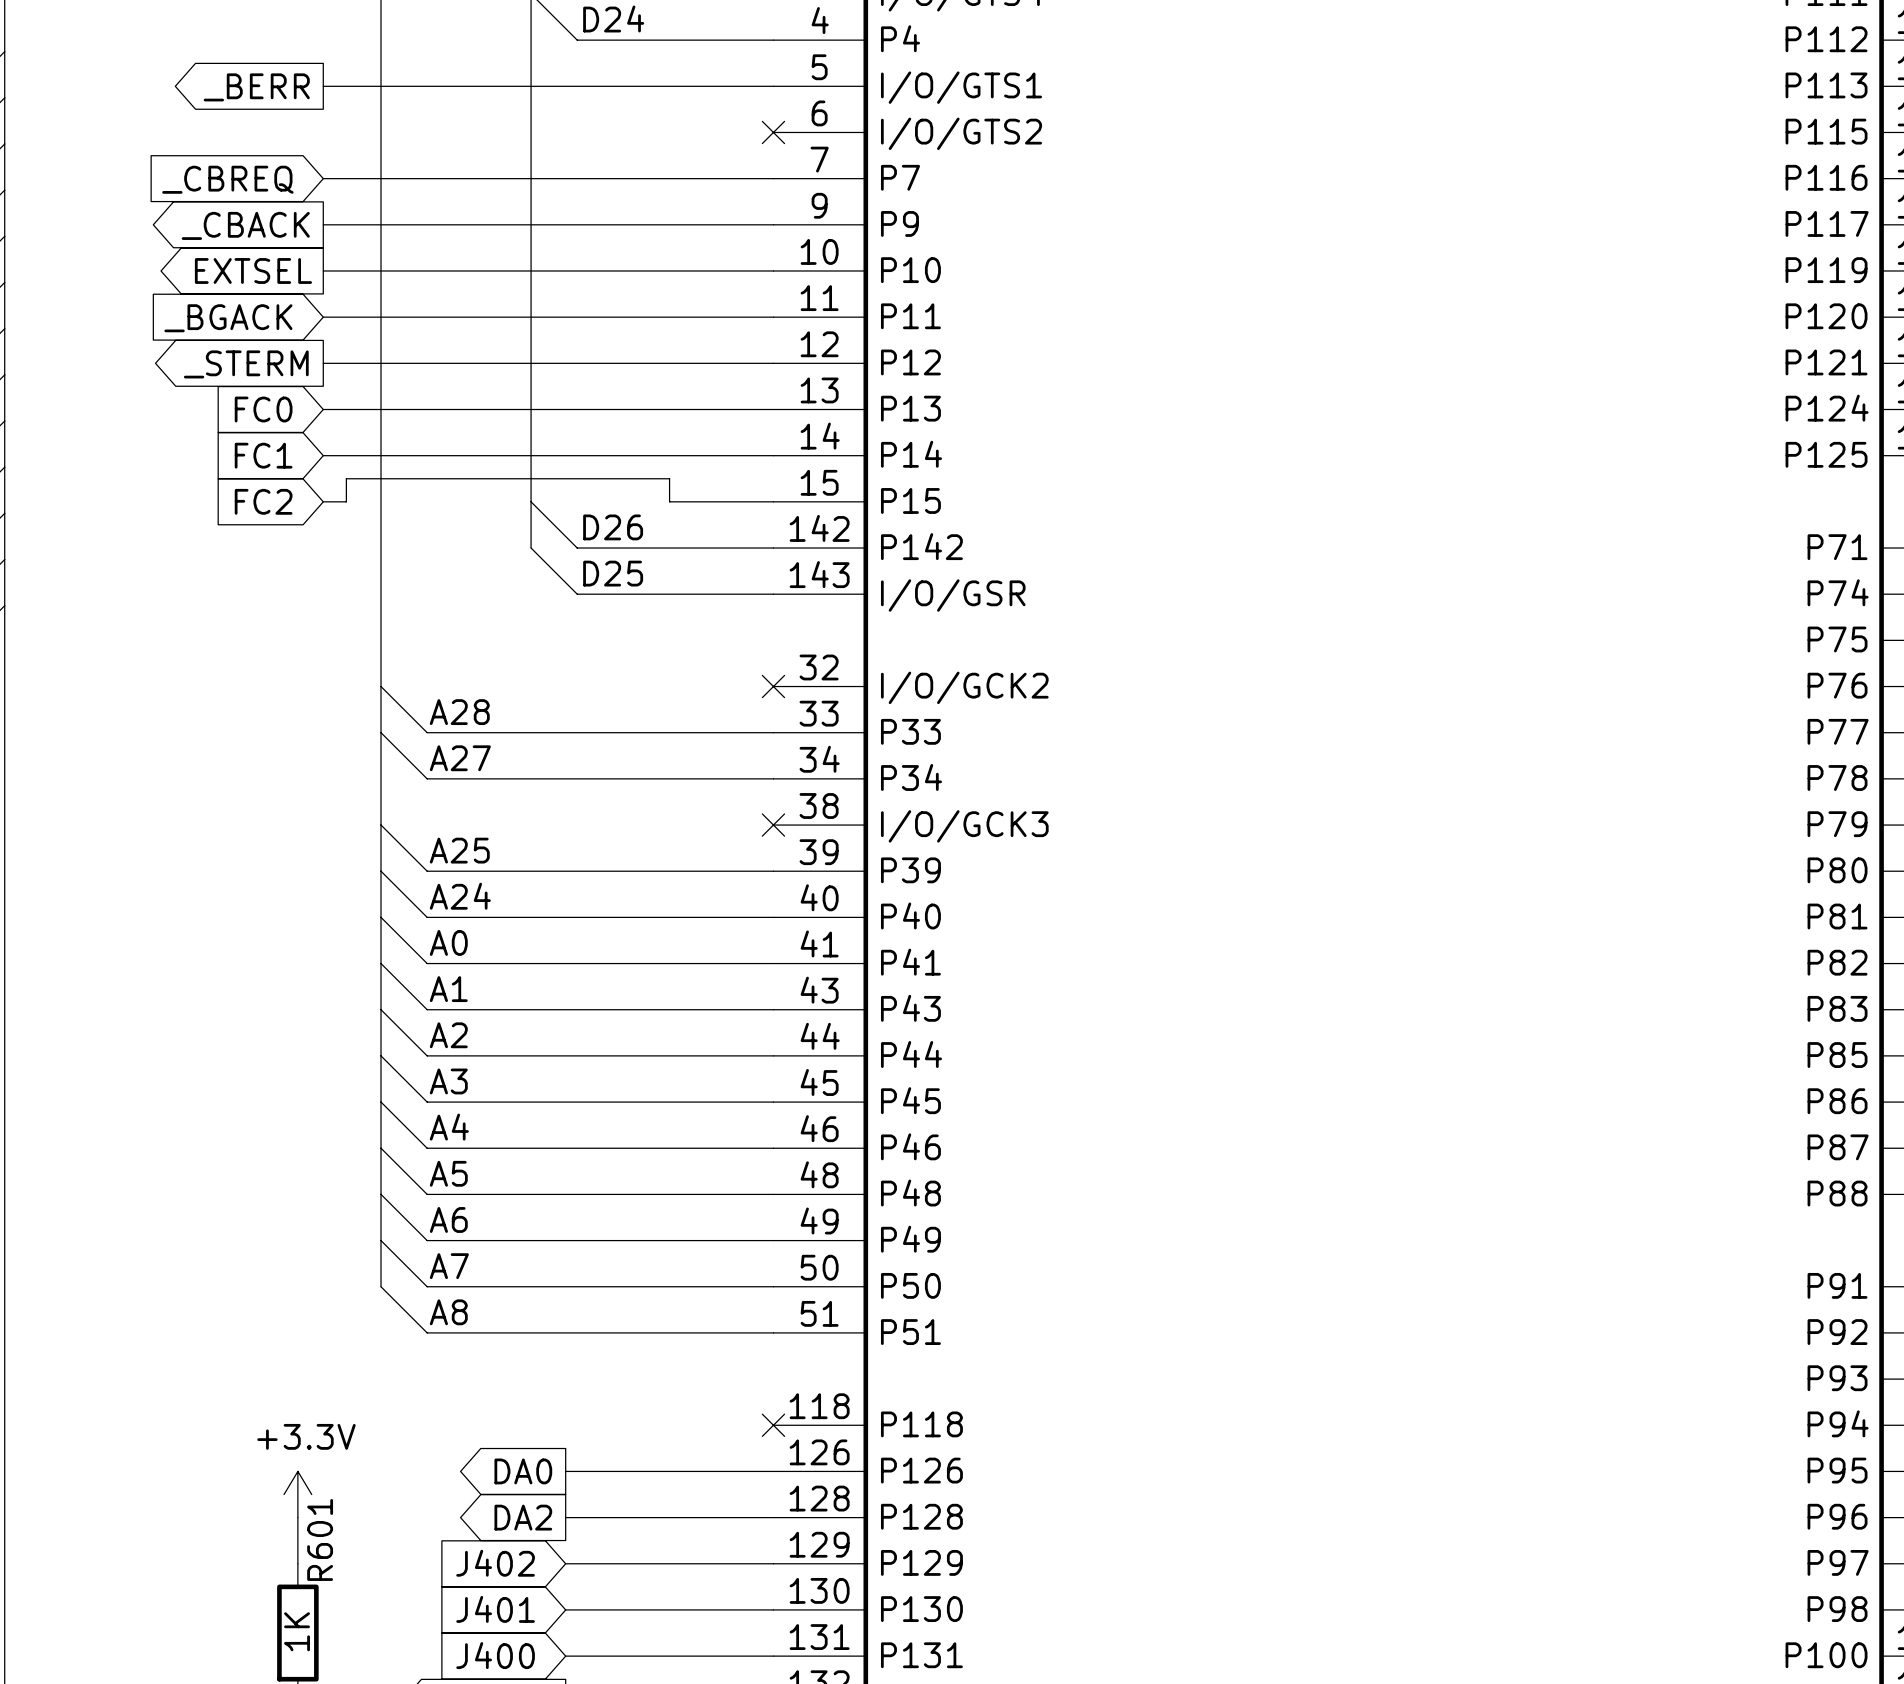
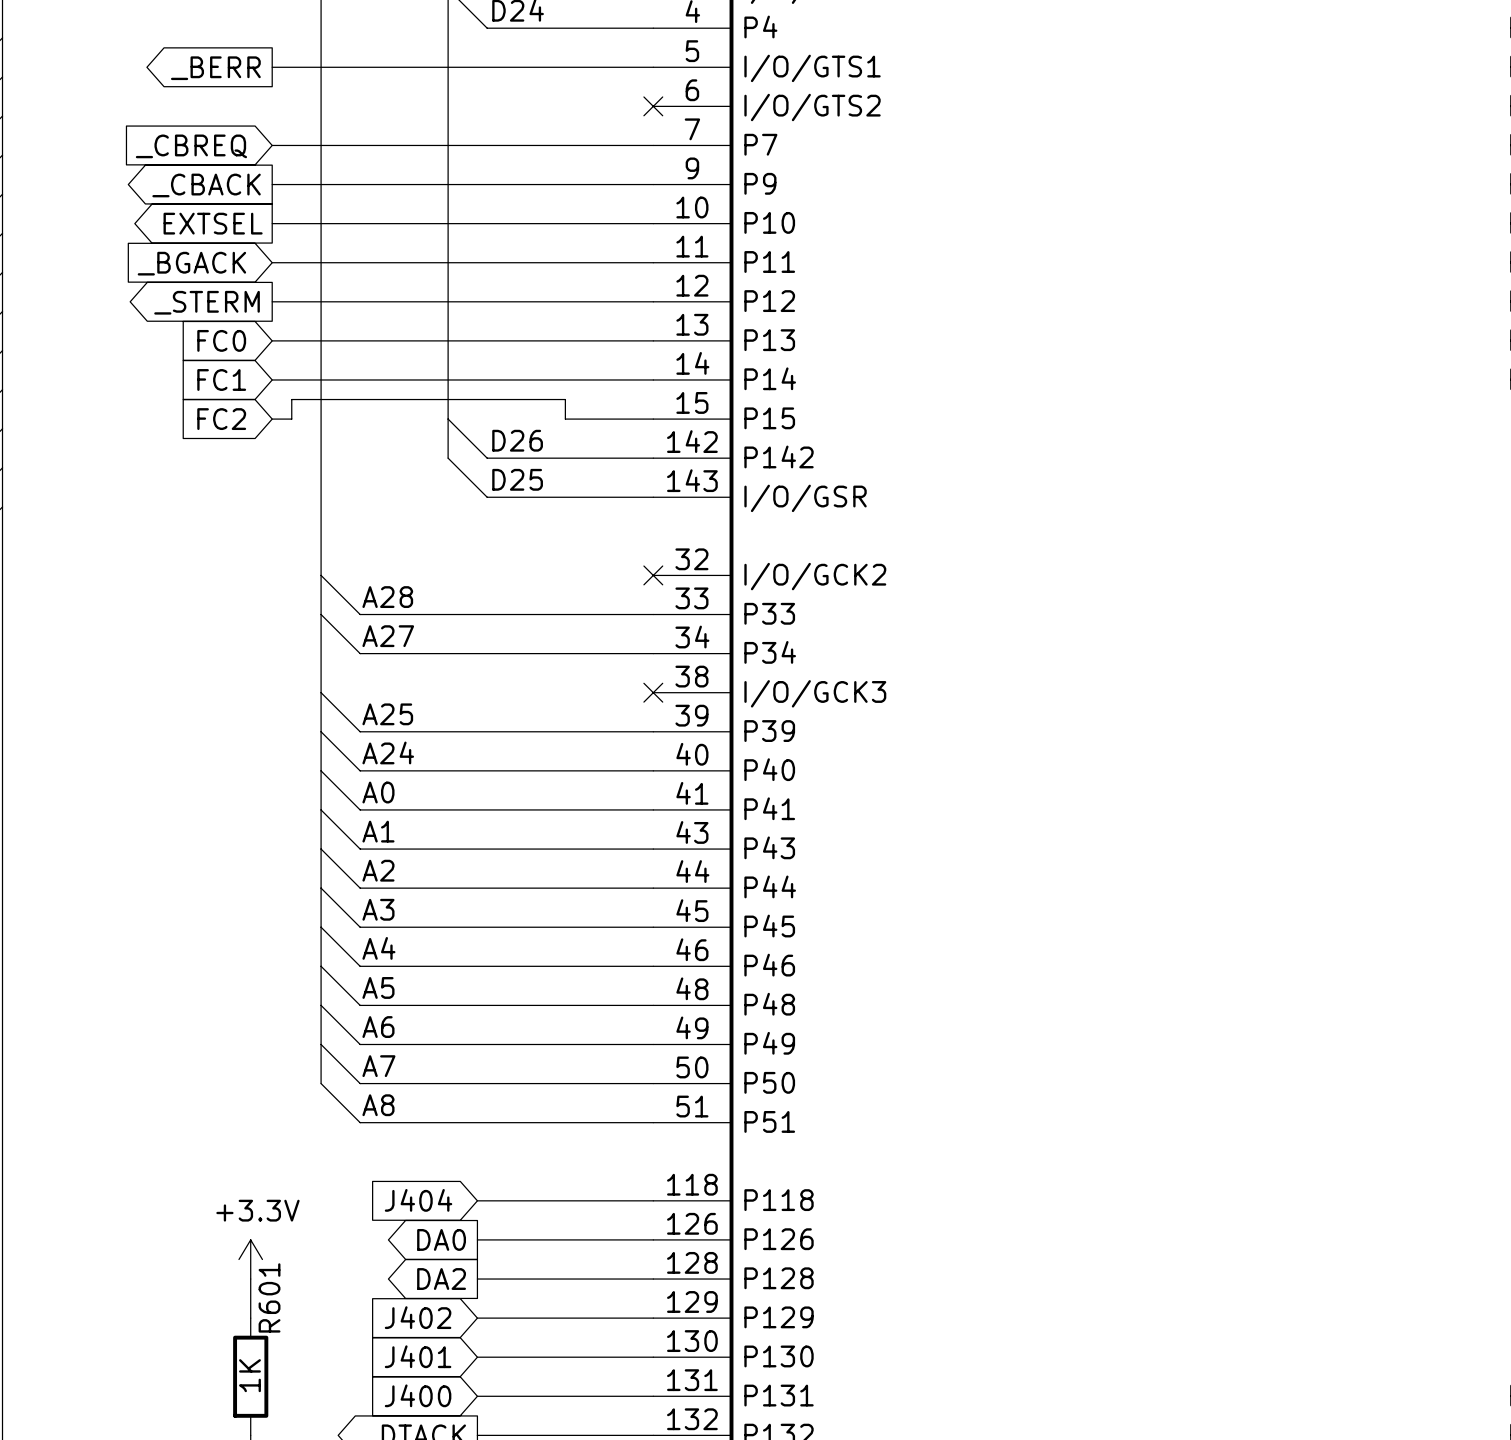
global label: none -> J404 (418, 1200)
wire: none -> (477, 1200) (653, 1200)
no-connect mark: (773, 1425) -> none

